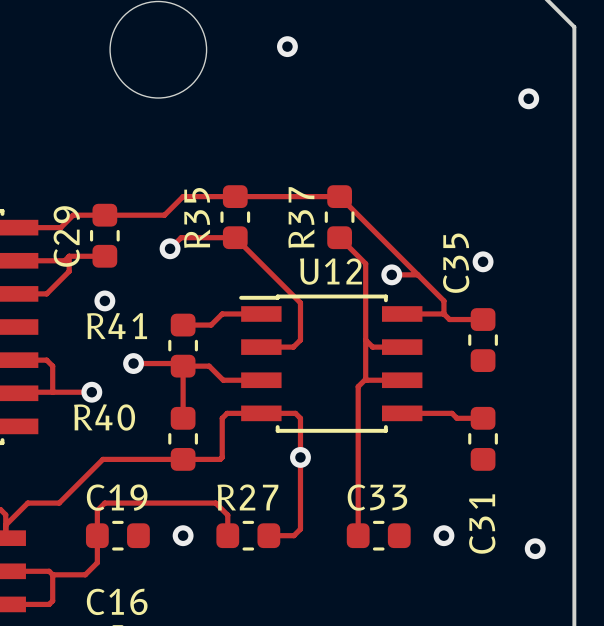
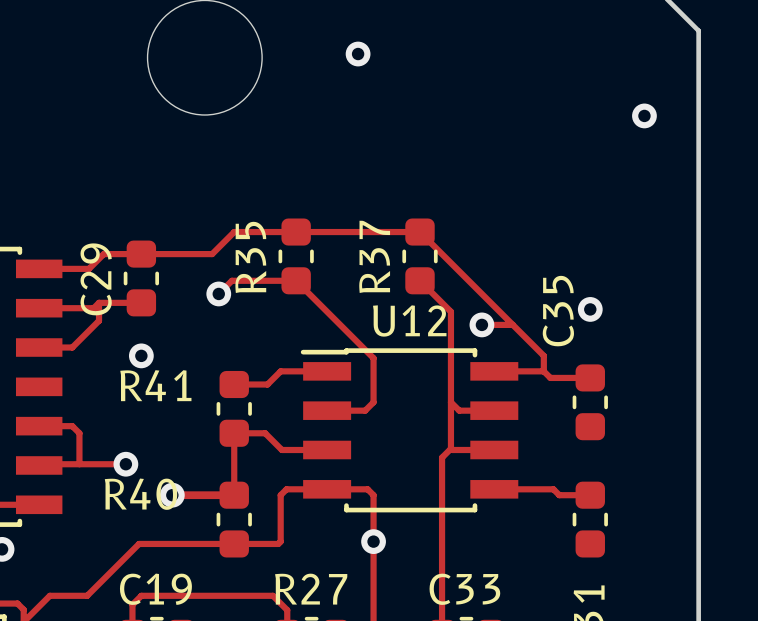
track: (133, 363) (180, 363) (183, 366) -> none
via position: (133, 363) -> (172, 495)
track: none -> (172, 495) (234, 495)

